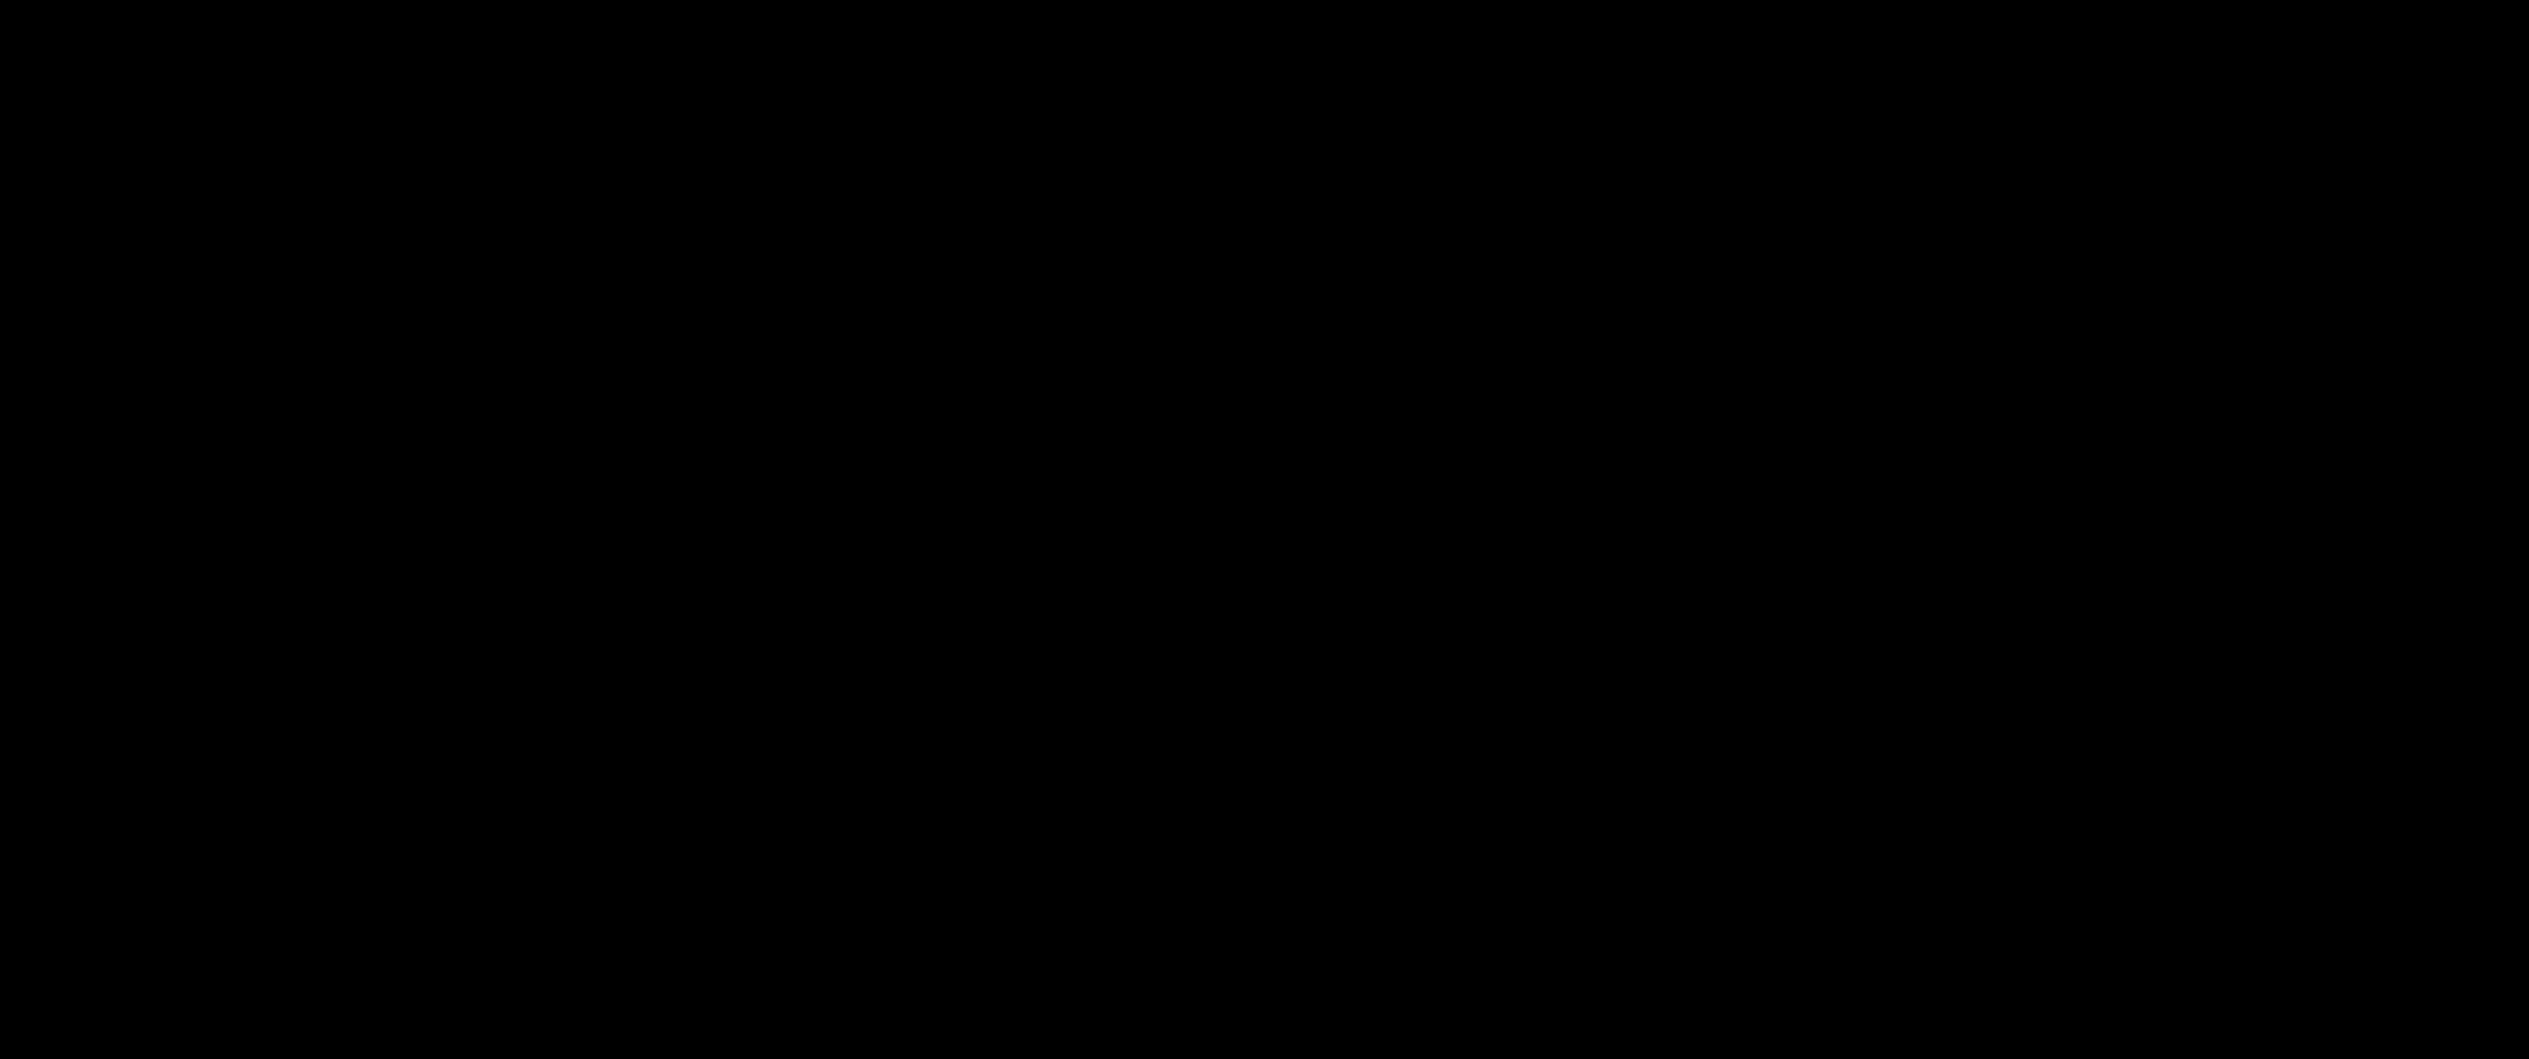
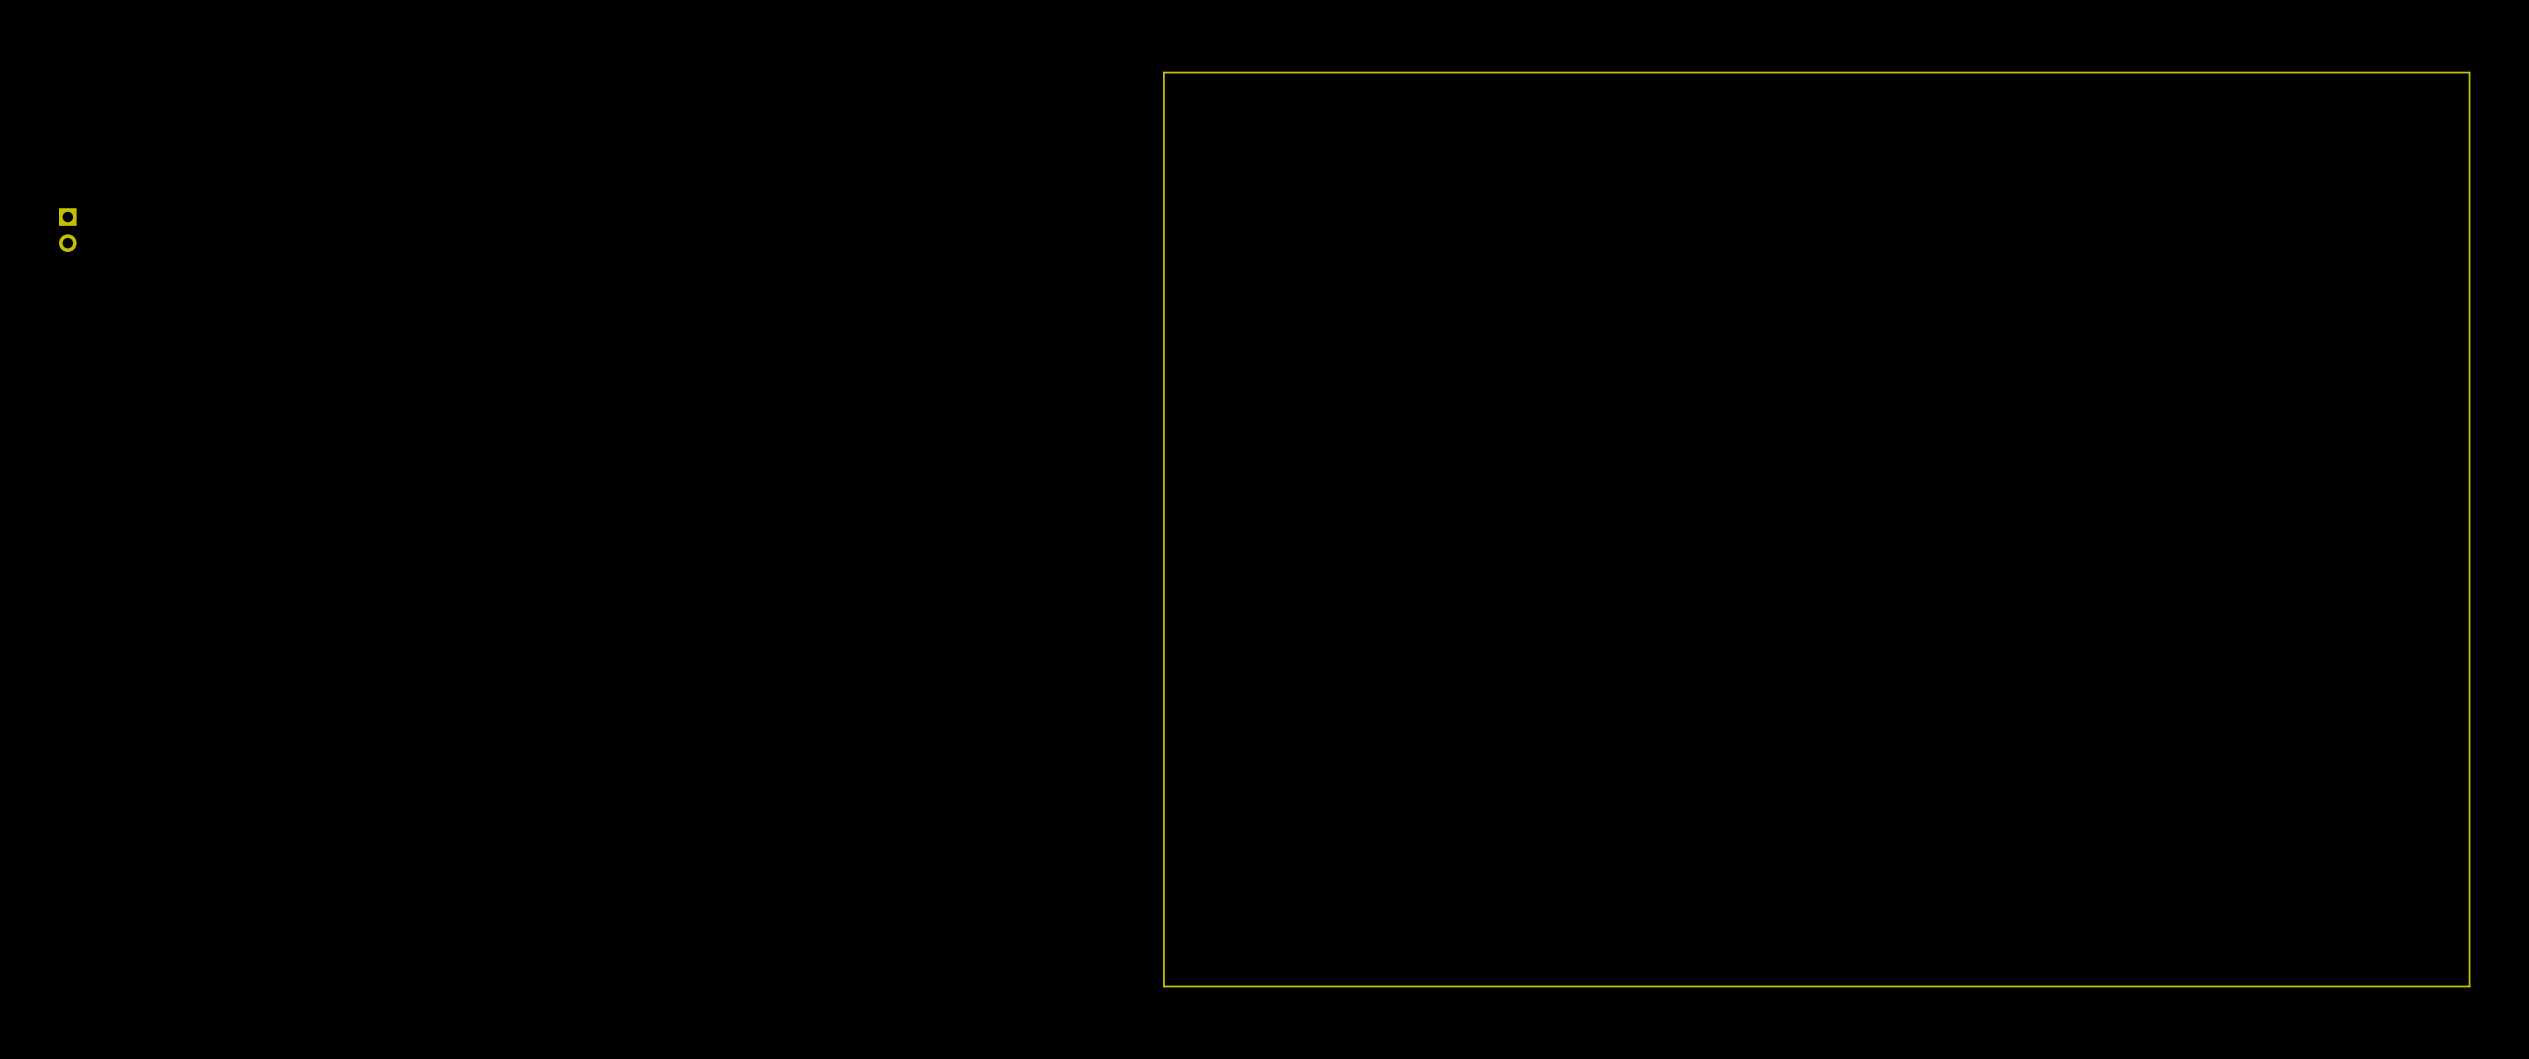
board edge: none -> (2469, 72) (2469, 986) (1163, 986) (1163, 72) (2469, 72)
part: none -> (67, 230)

